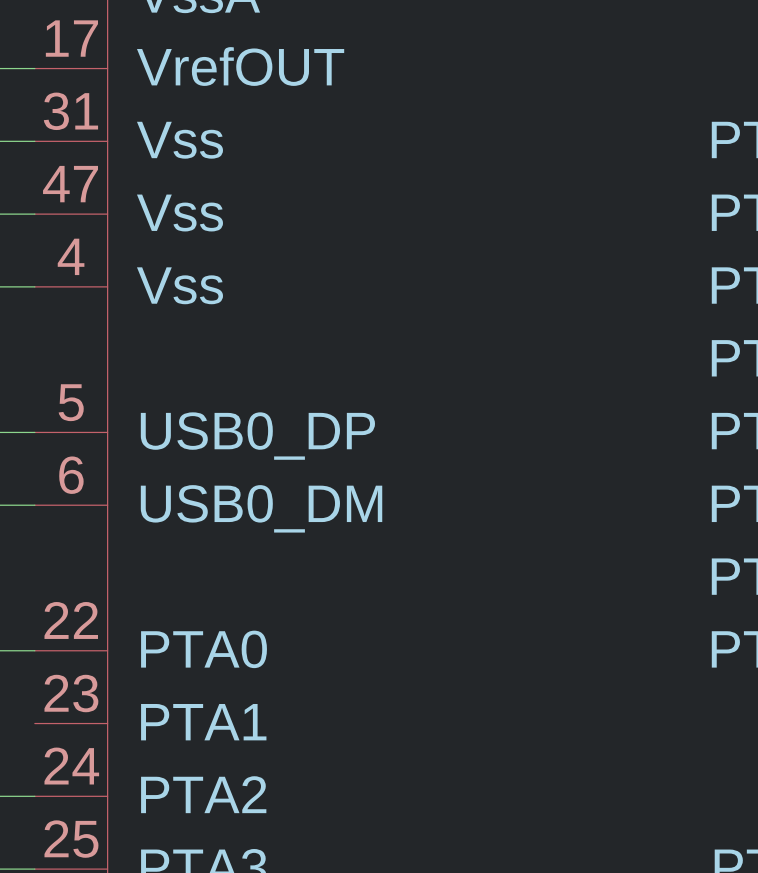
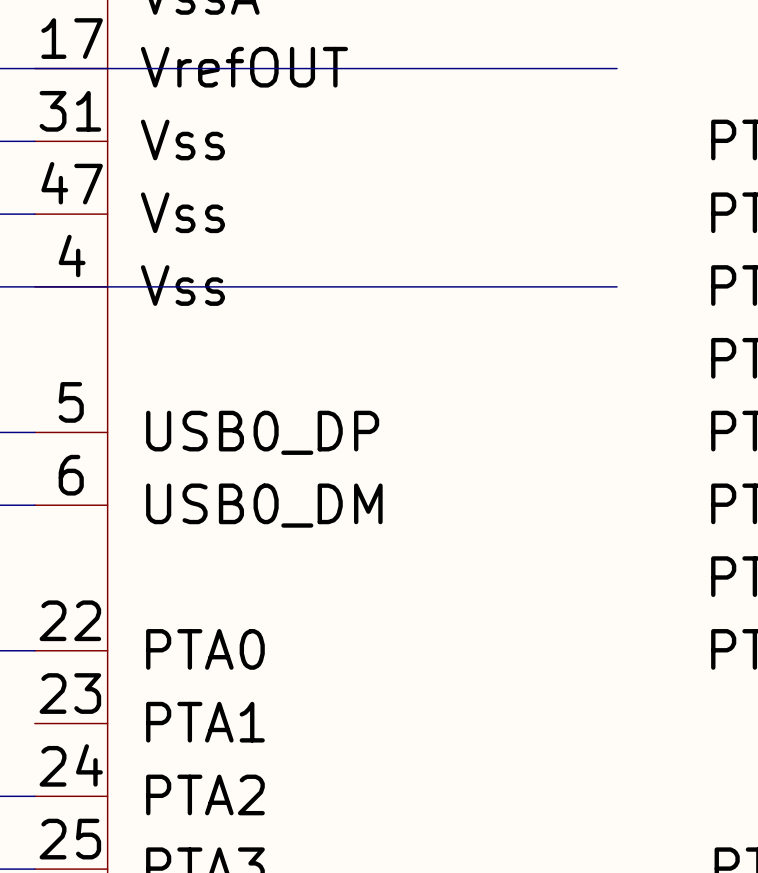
wire: none -> (34, 68) (617, 68)
wire: none -> (34, 286) (617, 286)

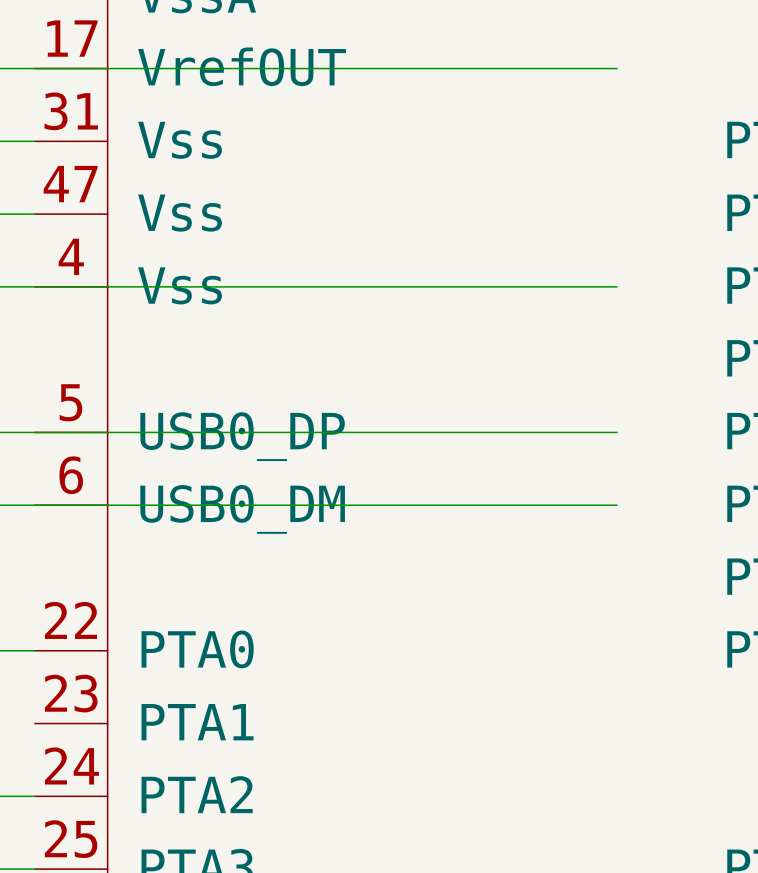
wire: none -> (34, 432) (617, 432)
wire: none -> (34, 505) (617, 505)

